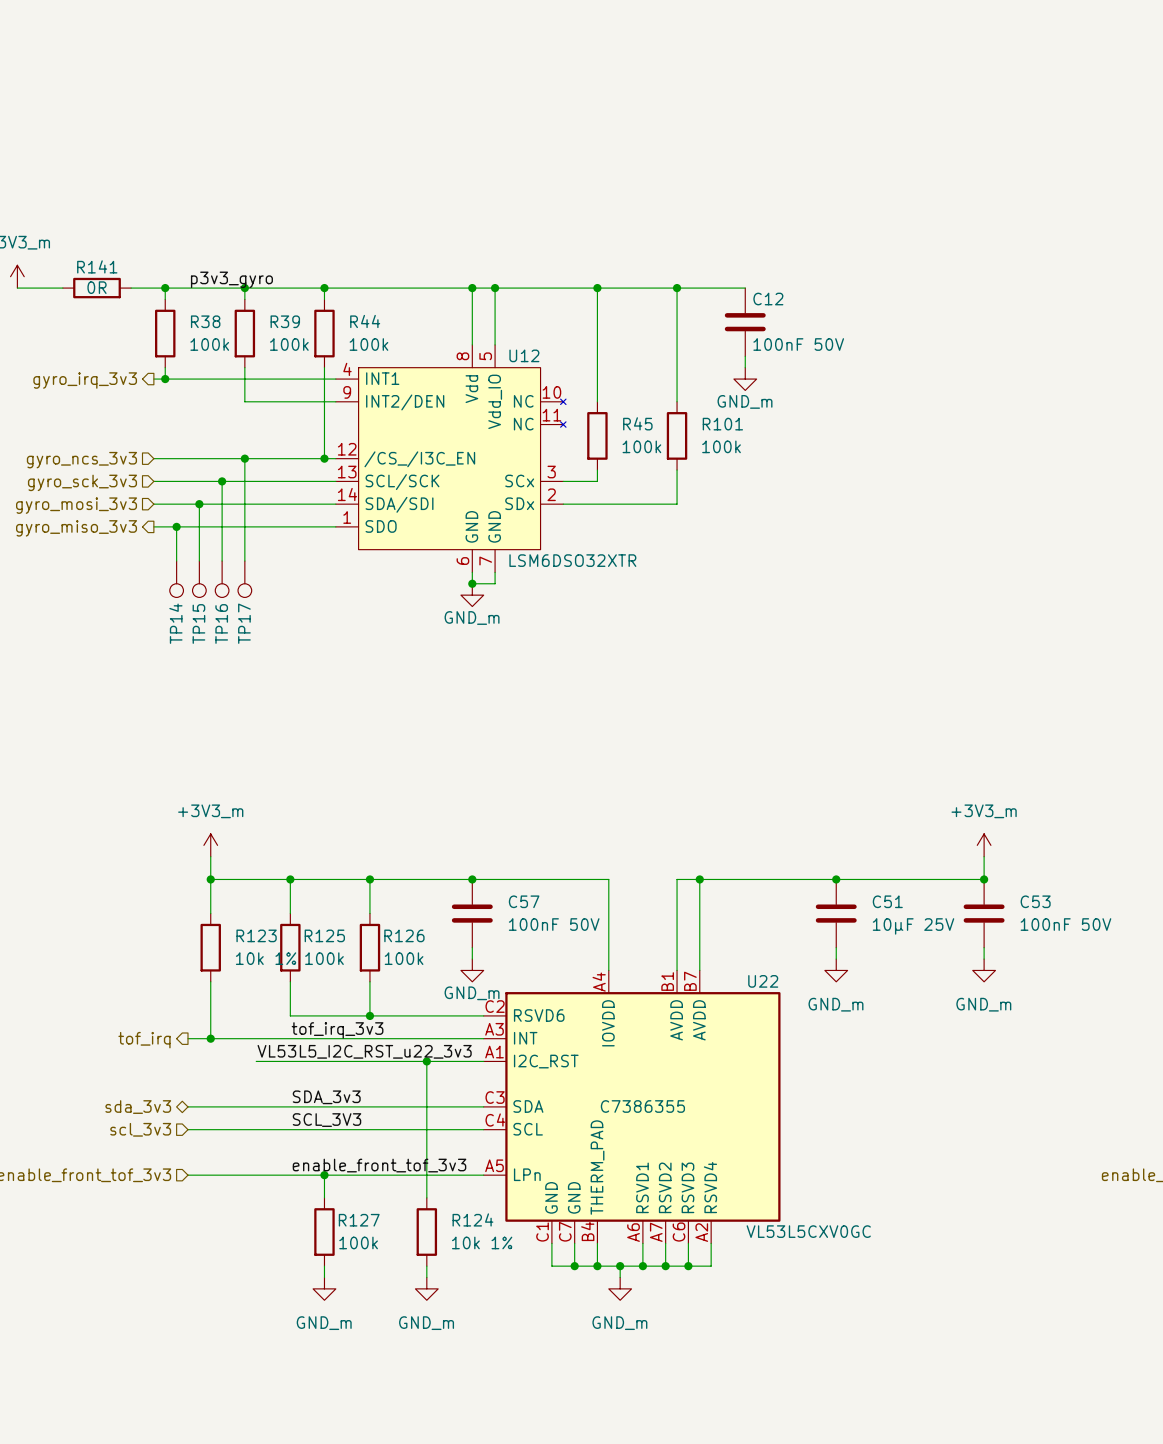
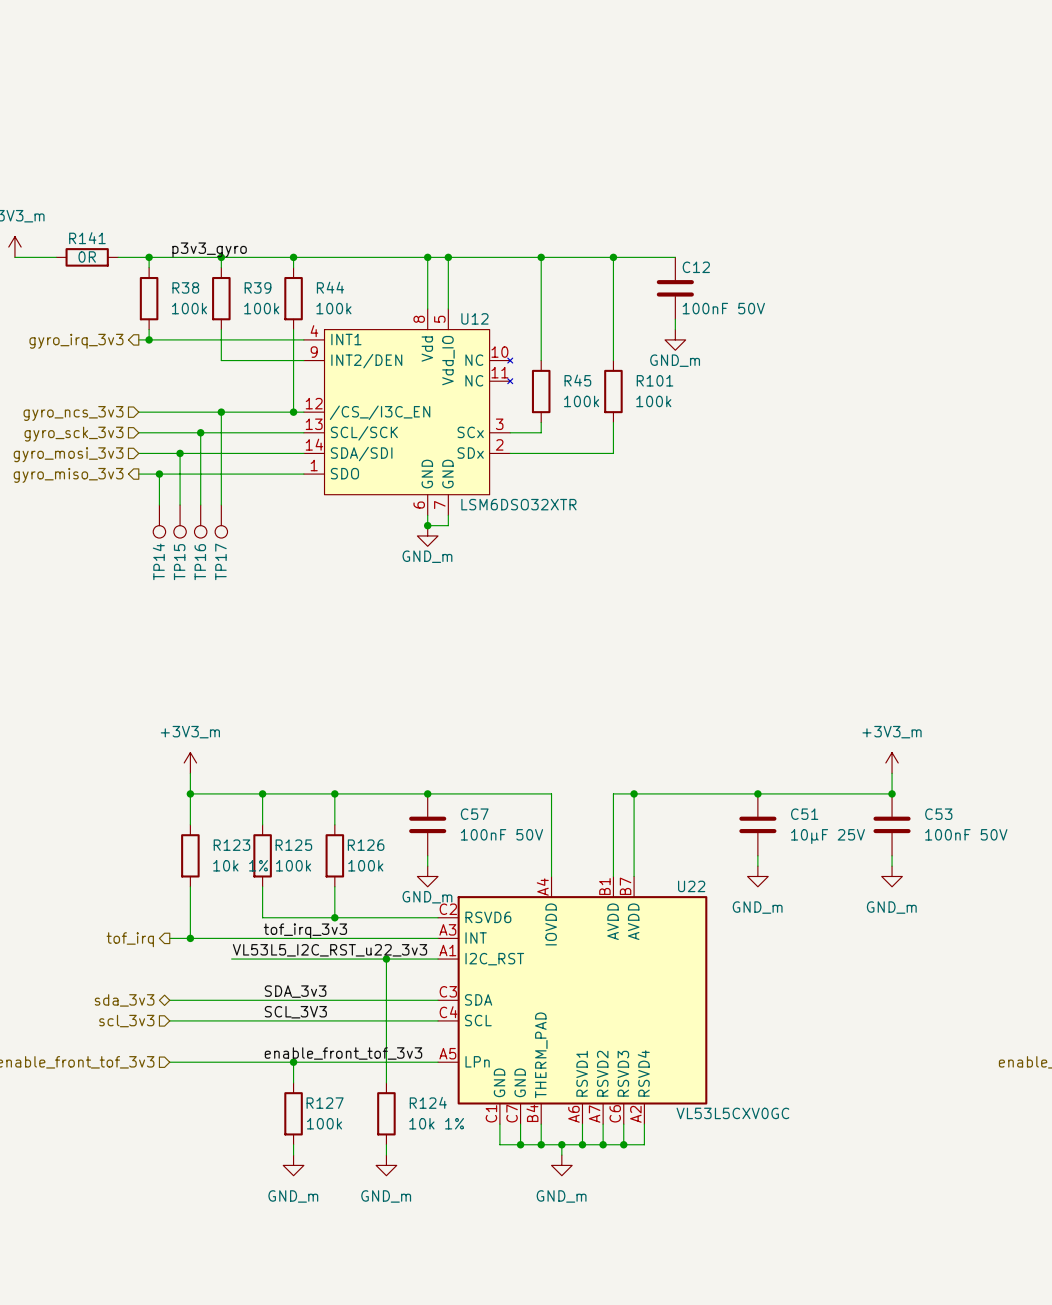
U22 text: C7386355 (642, 1106) -> none

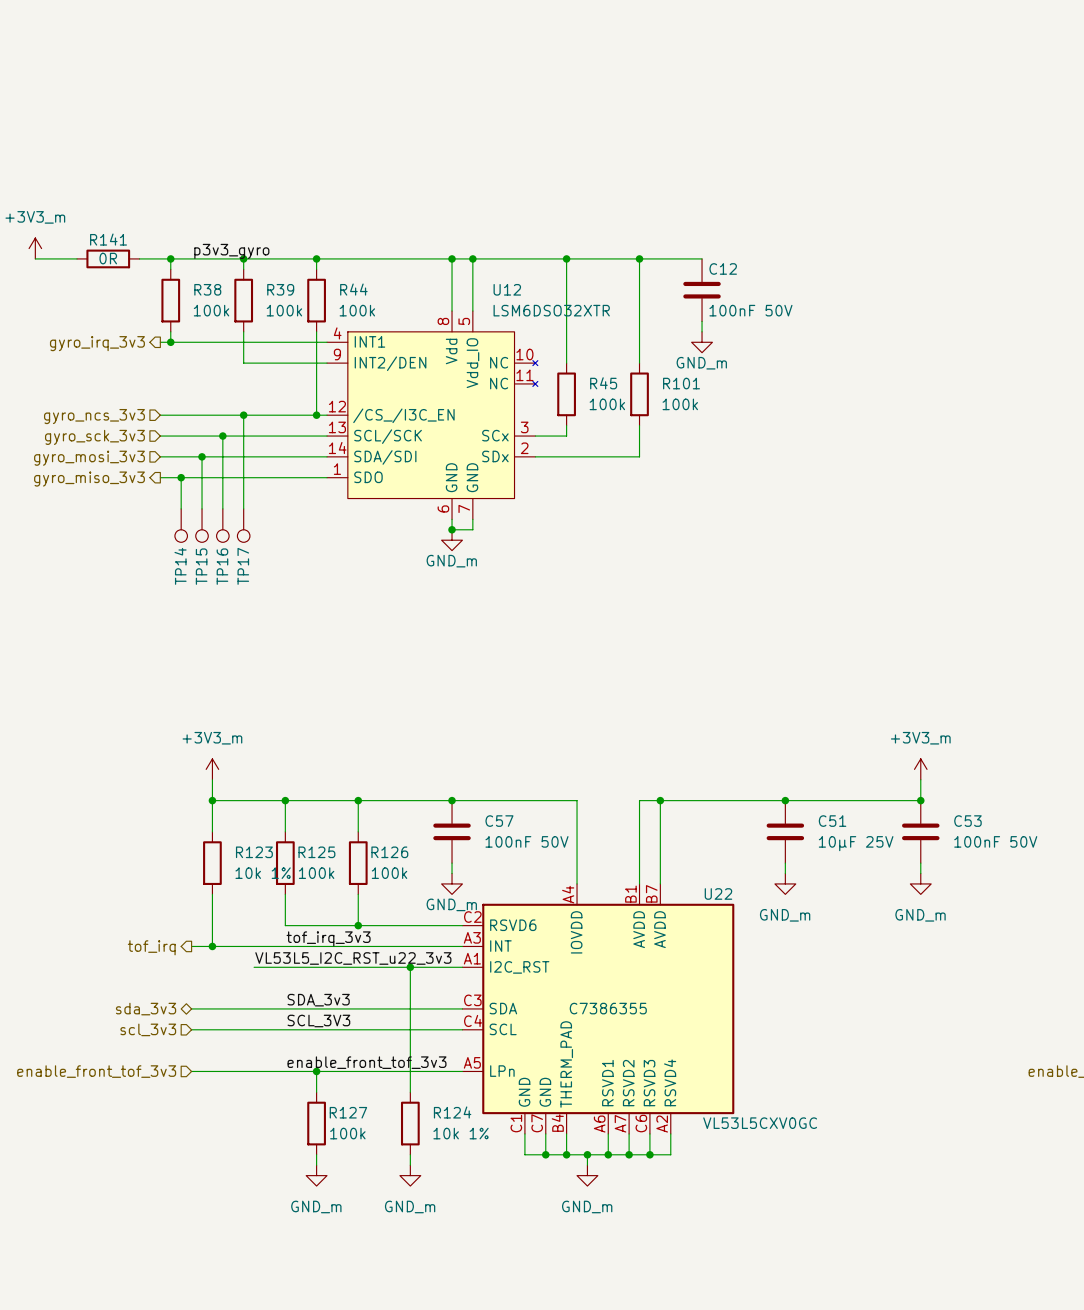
U12 name position: U12 (474, 318) -> U12 (507, 289)
U12 value position: LSM6DSO32XTR (518, 504) -> LSM6DSO32XTR (551, 310)
U22 text: none -> C7386355 (608, 1008)

